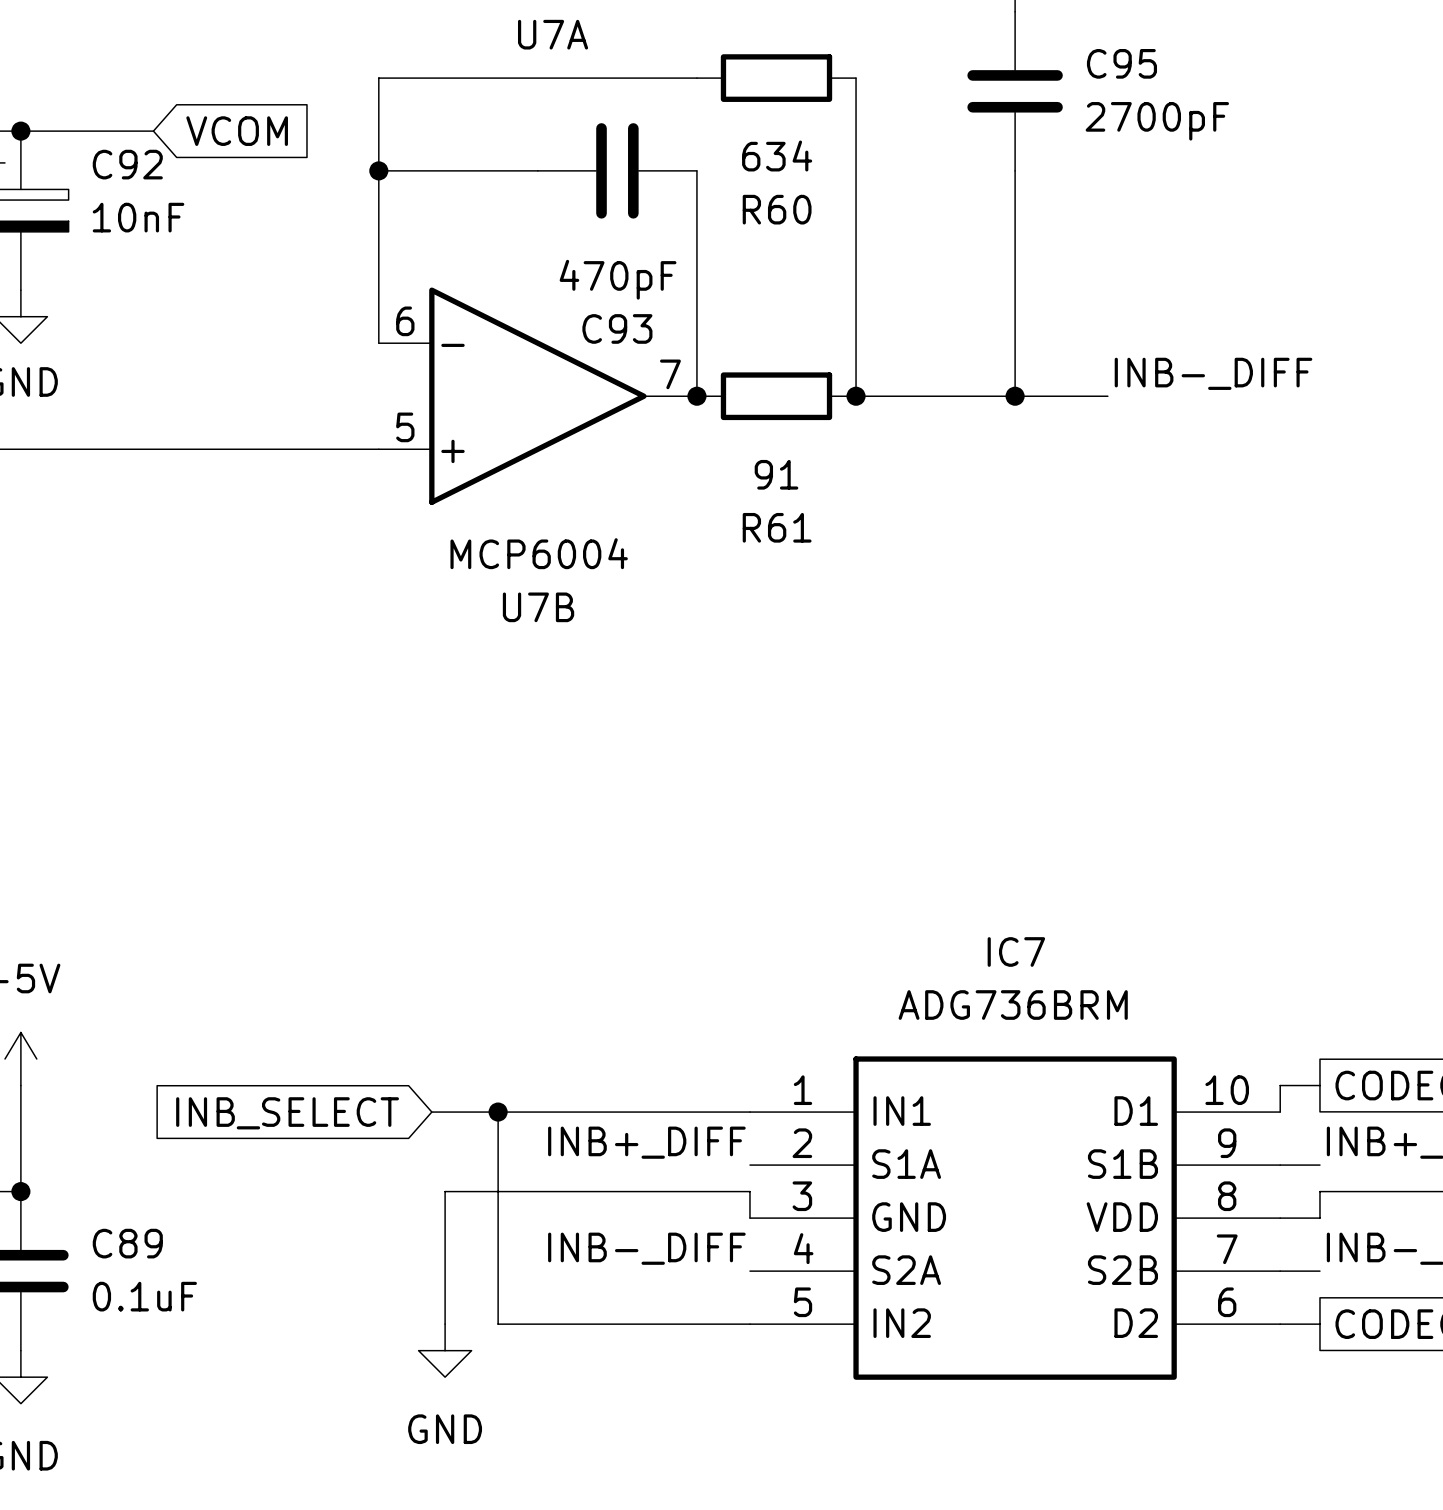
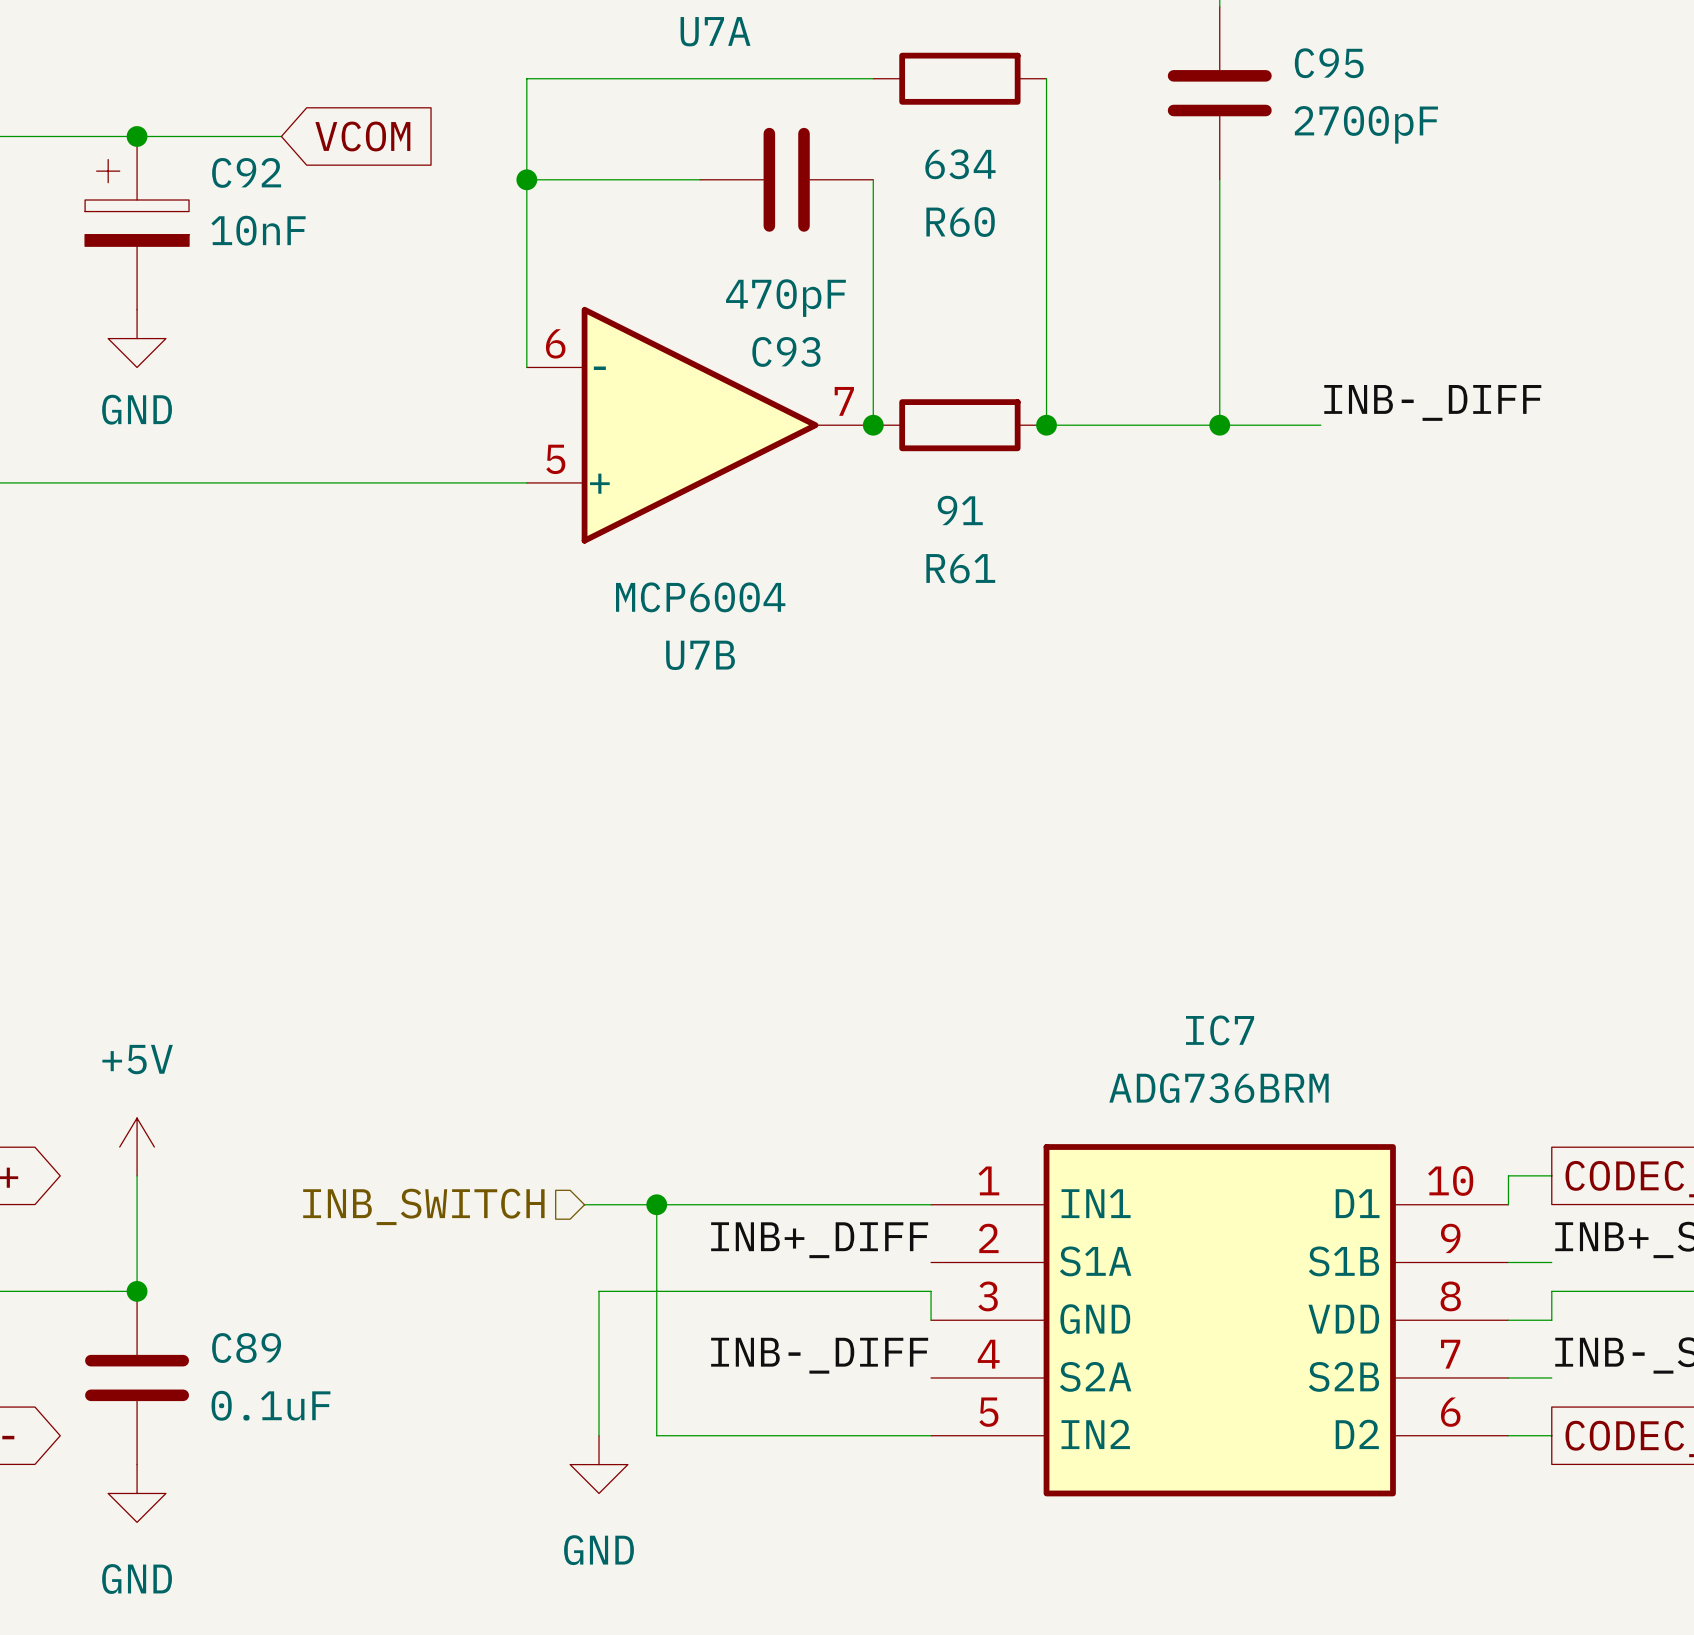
hierarchical label: none -> INB_SWITCH (423, 1206)
global label: INB_SELECT (287, 1113) -> none

